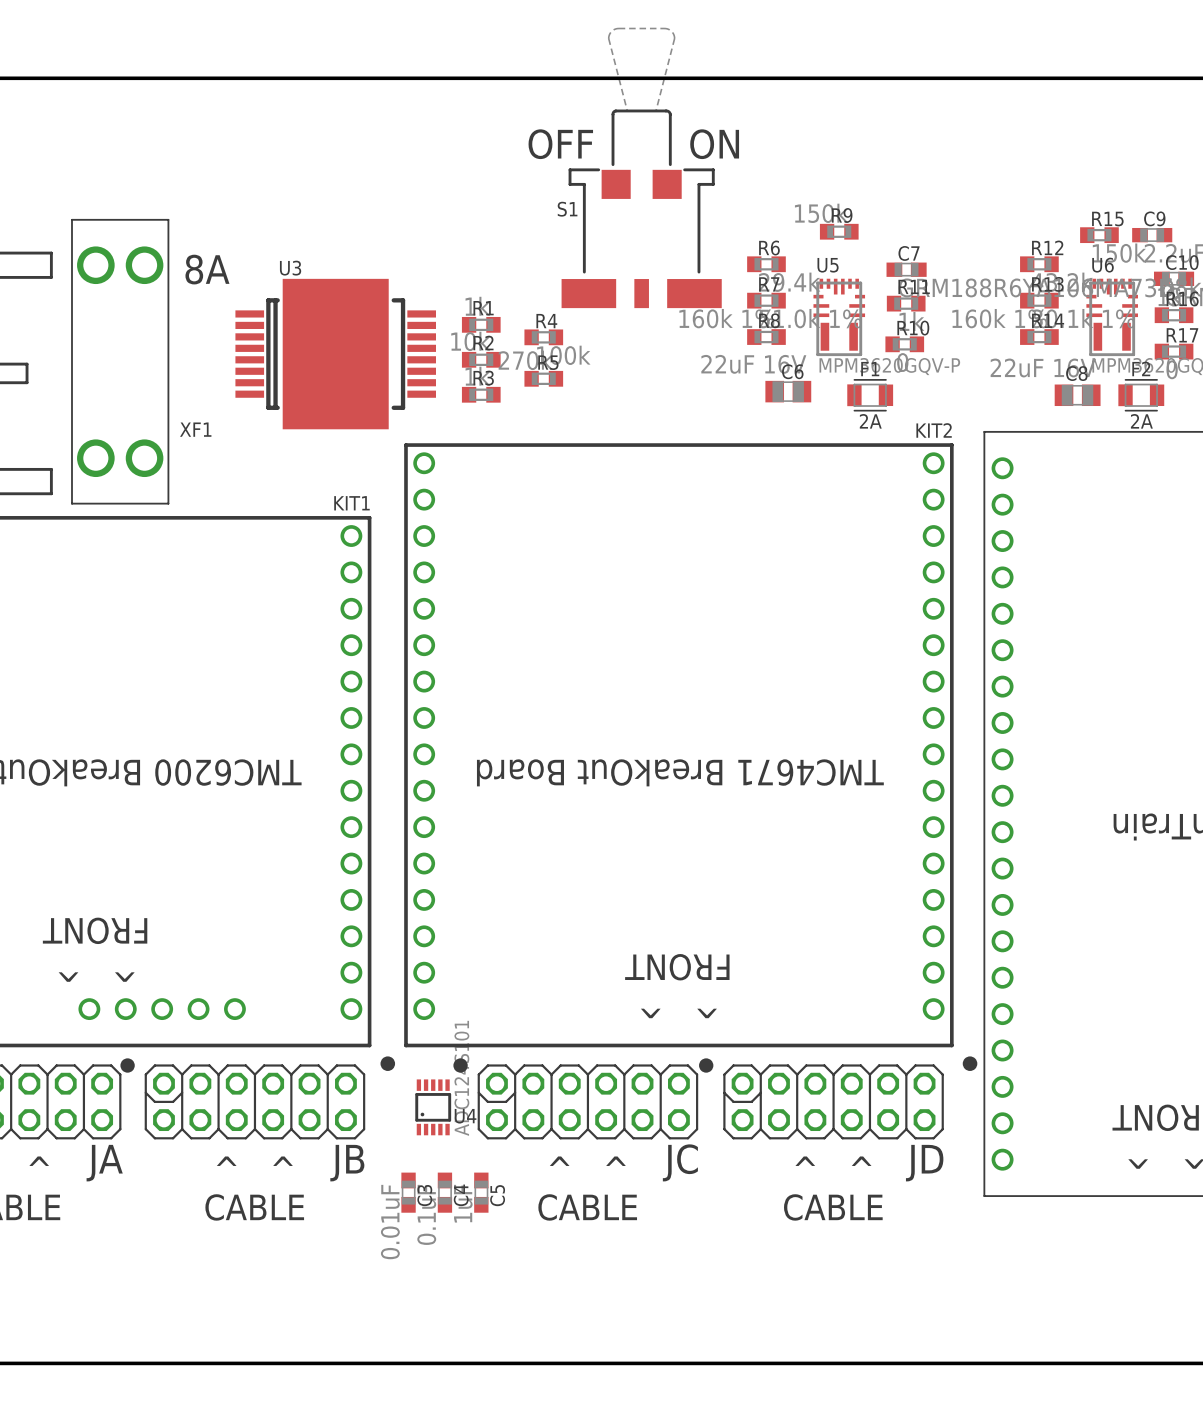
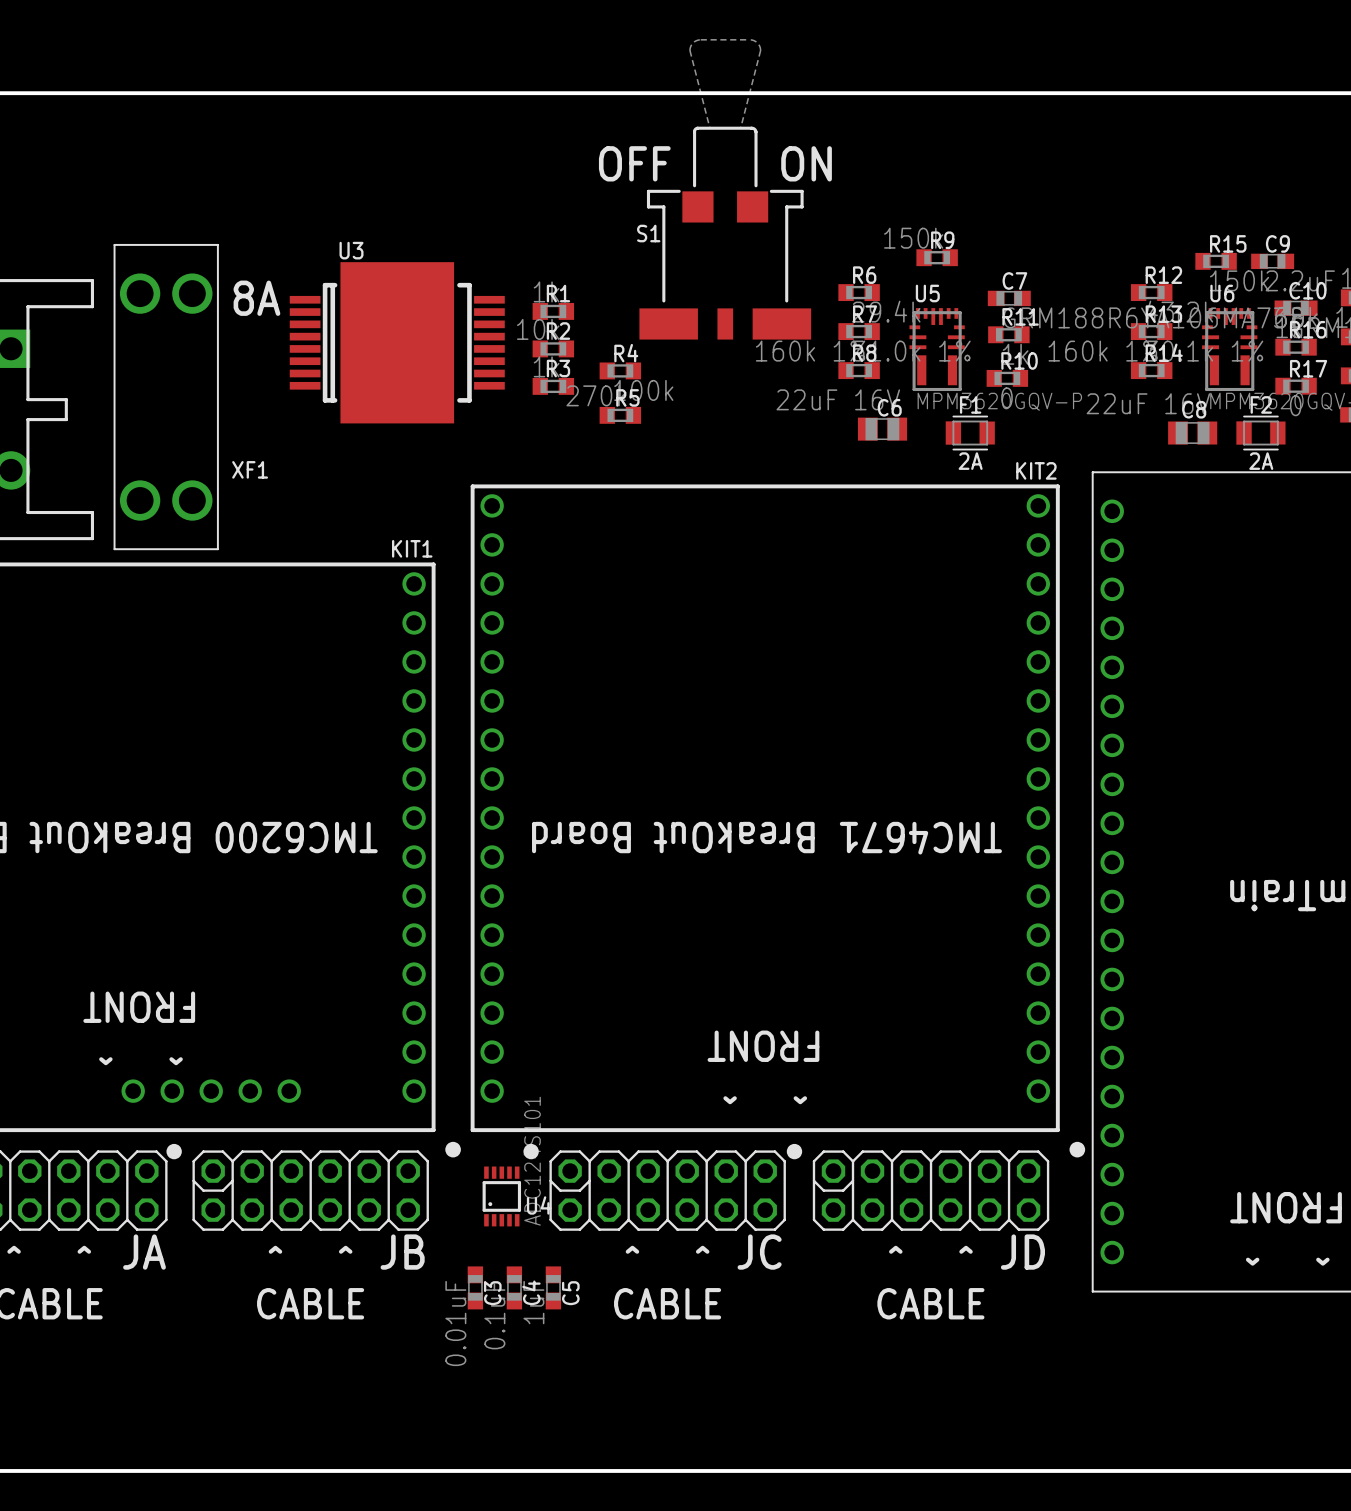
R1 position: (481, 324) -> (553, 311)
U3 position: (335, 354) -> (397, 342)
R2 position: (481, 359) -> (553, 348)
R3 position: (481, 394) -> (553, 386)

